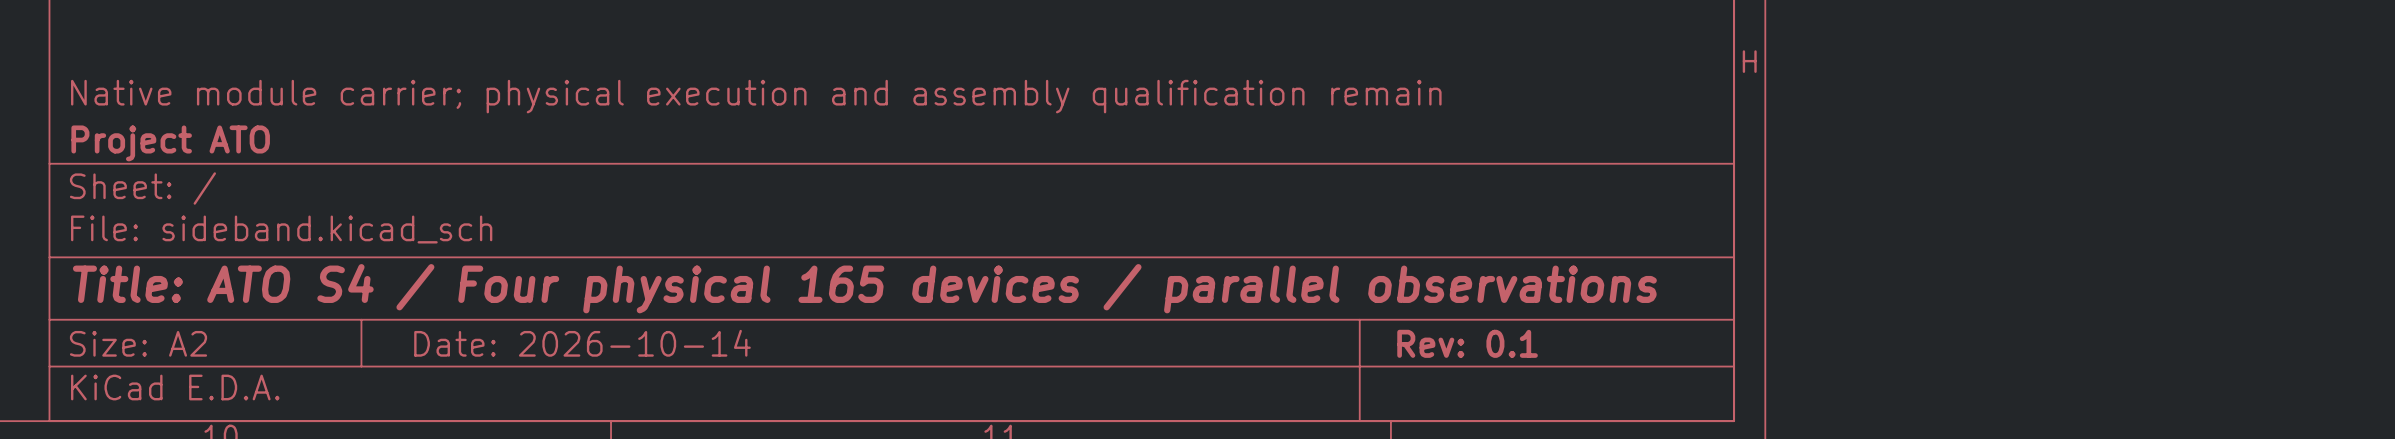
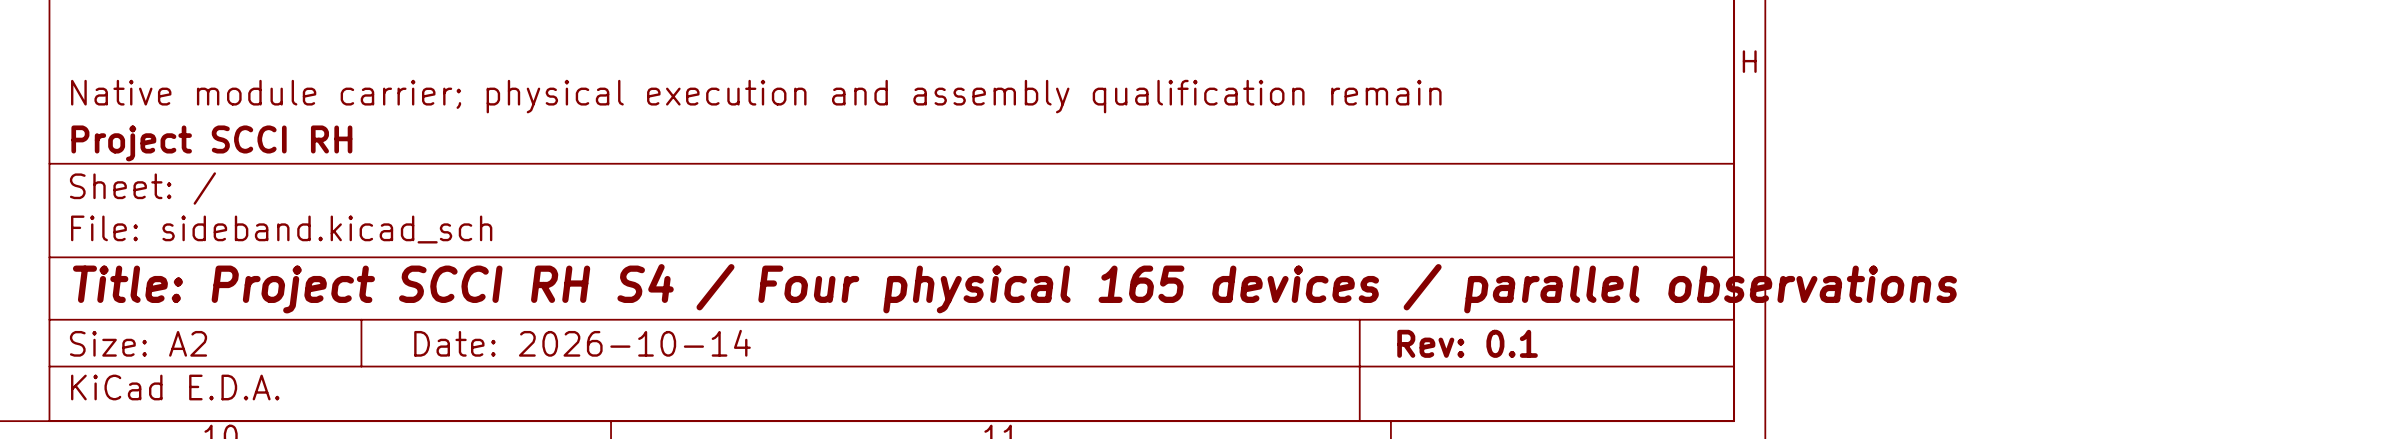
title block: Project ATO (170, 143) -> Project SCCI RH (211, 143)
title block: Title: ATO S4 / Four physical 165 devices / parallel observations (864, 288) -> Title: Project SCCI RH S4 / Four physical 165 devices / parallel observations (1014, 288)

